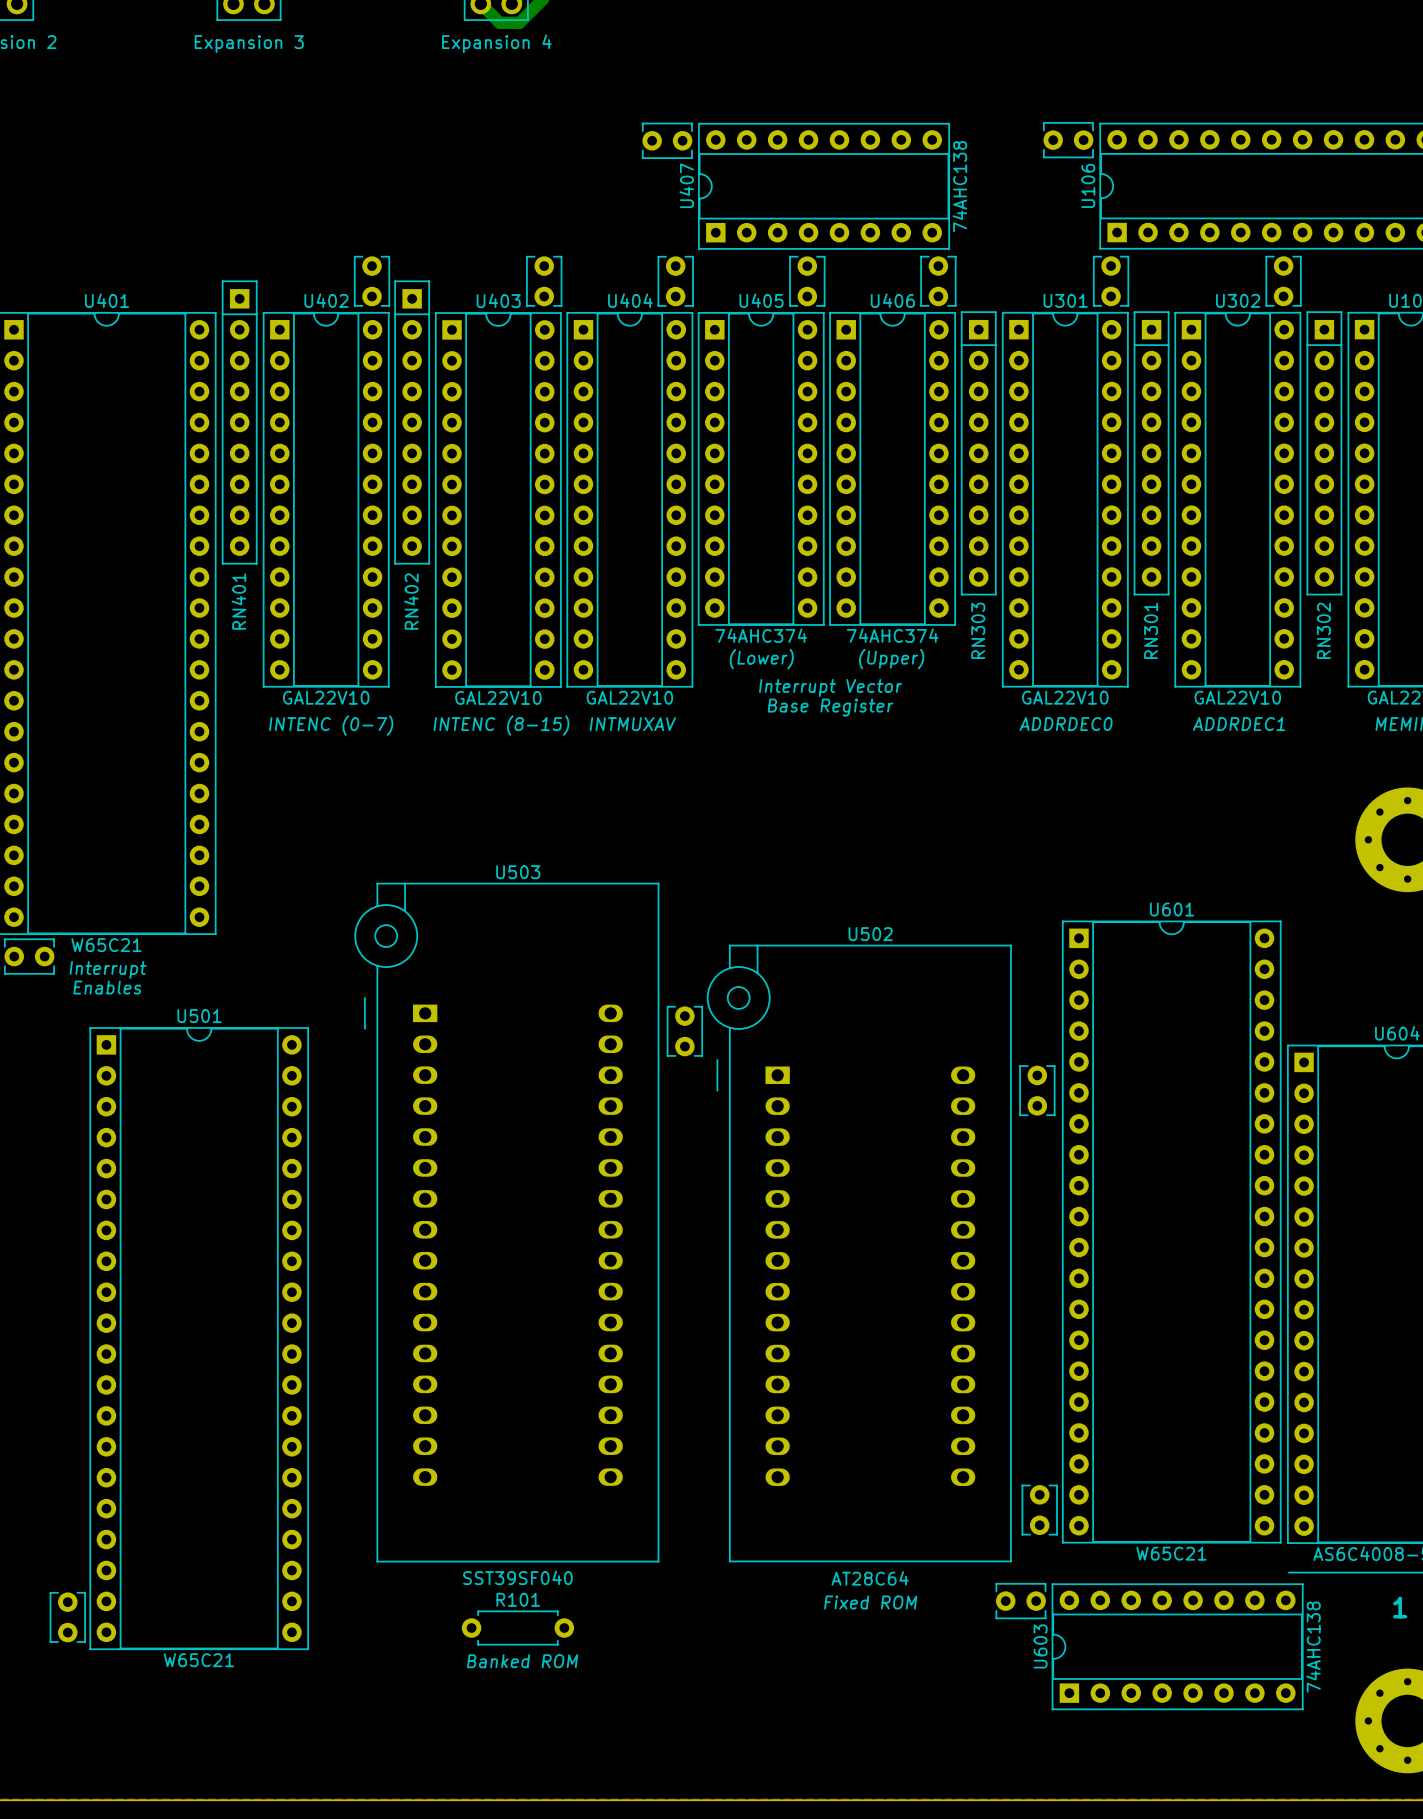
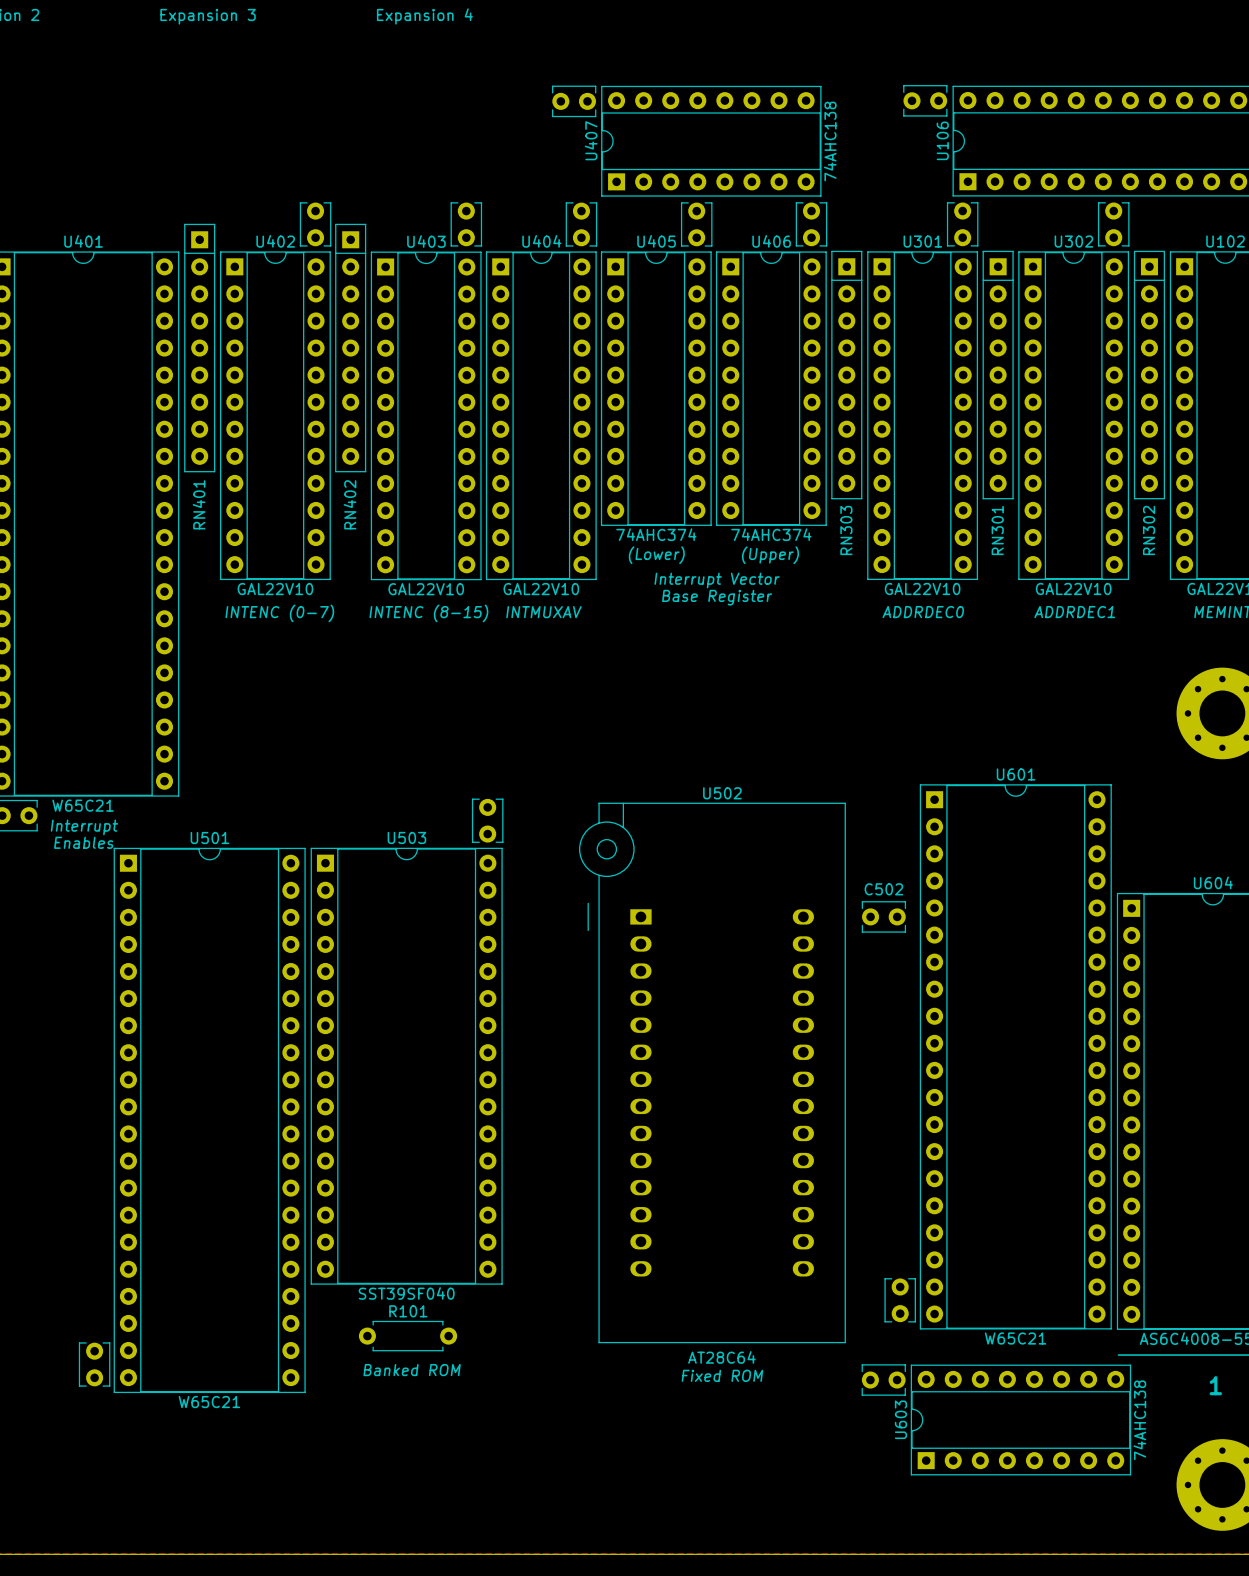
U503 name position: U503 (518, 872) -> U503 (406, 837)
U503 footprint: [354, 882, 660, 1563] -> [310, 847, 503, 1285]
part position: (684, 1031) -> (487, 820)
C502: none -> (883, 916)
part: (1037, 1090) -> none
U502 position: (859, 1253) -> (712, 1072)
U501 position: (199, 1338) -> (209, 1120)
U503 value position: SST39SF040 (517, 1577) -> SST39SF040 (406, 1293)
text position: Fixed ROM (870, 1602) -> Fixed ROM (722, 1375)
part position: (67, 1617) -> (94, 1364)
R101 position: (517, 1628) -> (408, 1336)
text position: Banked ROM (522, 1661) -> Banked ROM (412, 1370)

